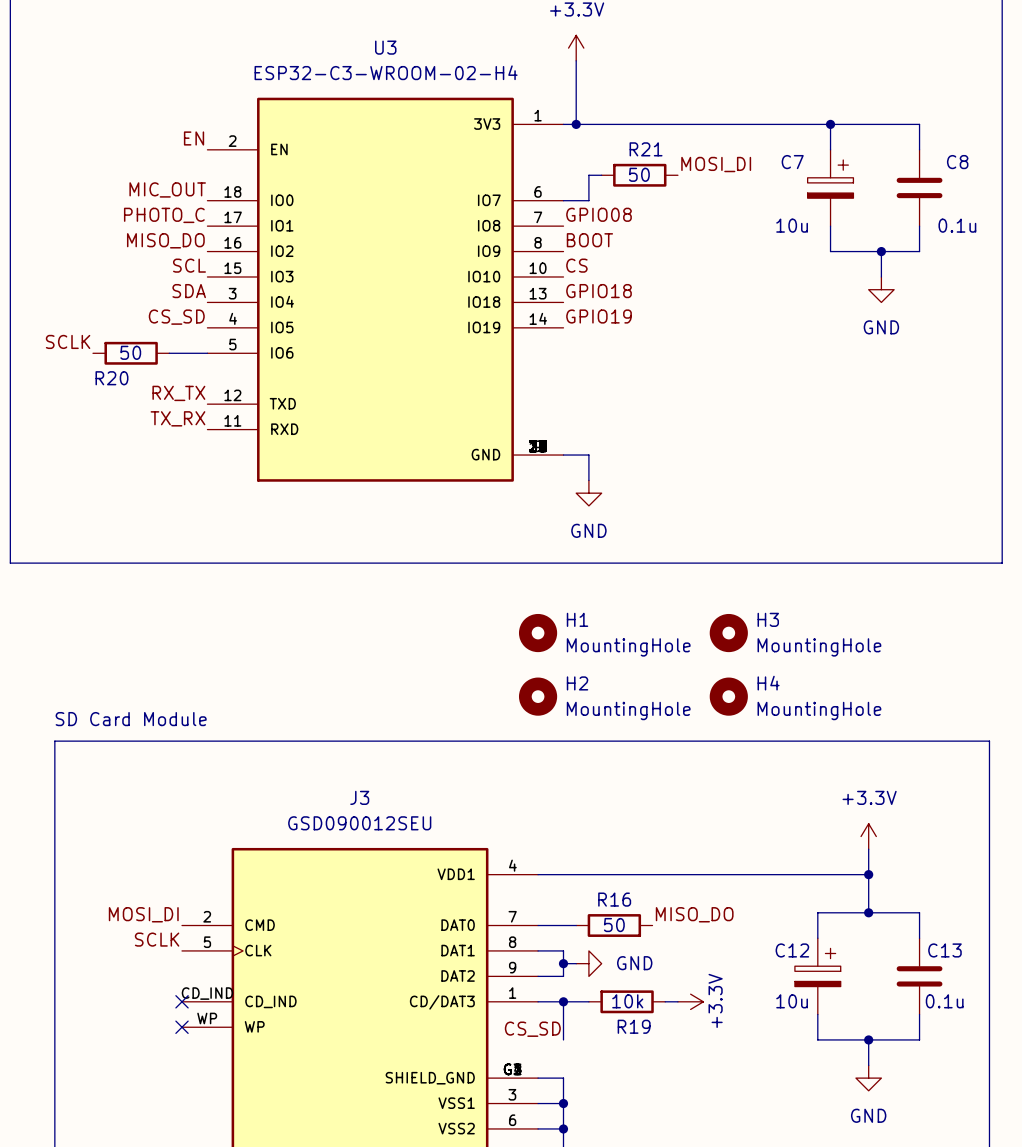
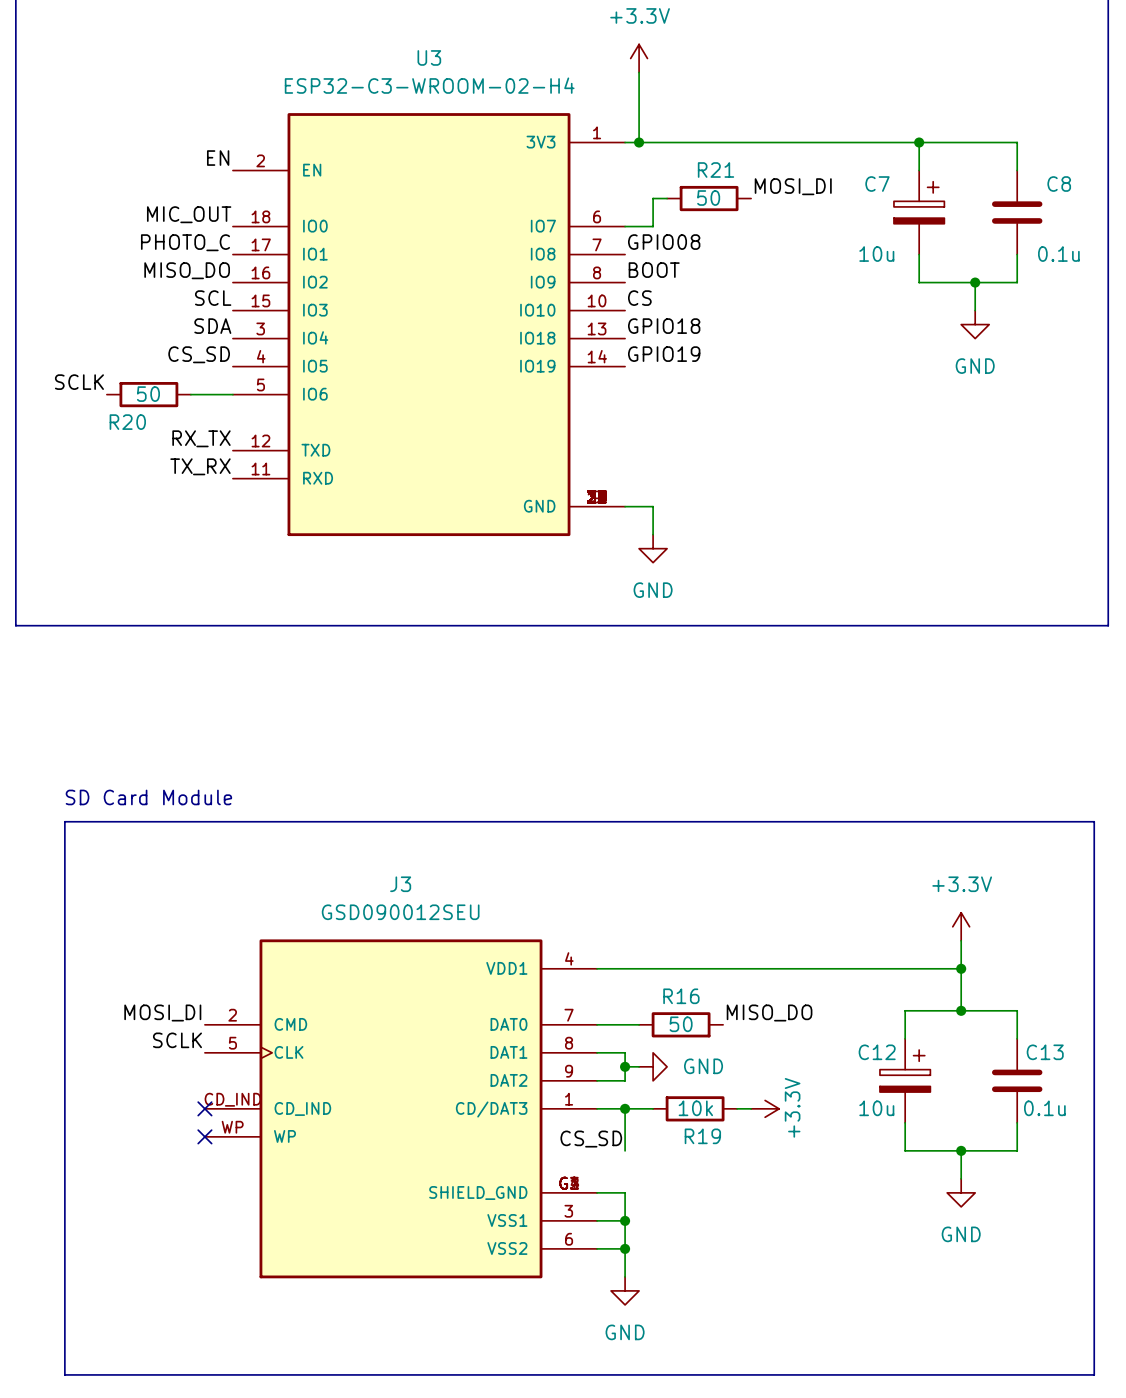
H1: MountingHole (538, 633) -> none
H3: MountingHole (728, 633) -> none
H2: MountingHole (538, 696) -> none
H4: MountingHole (728, 696) -> none

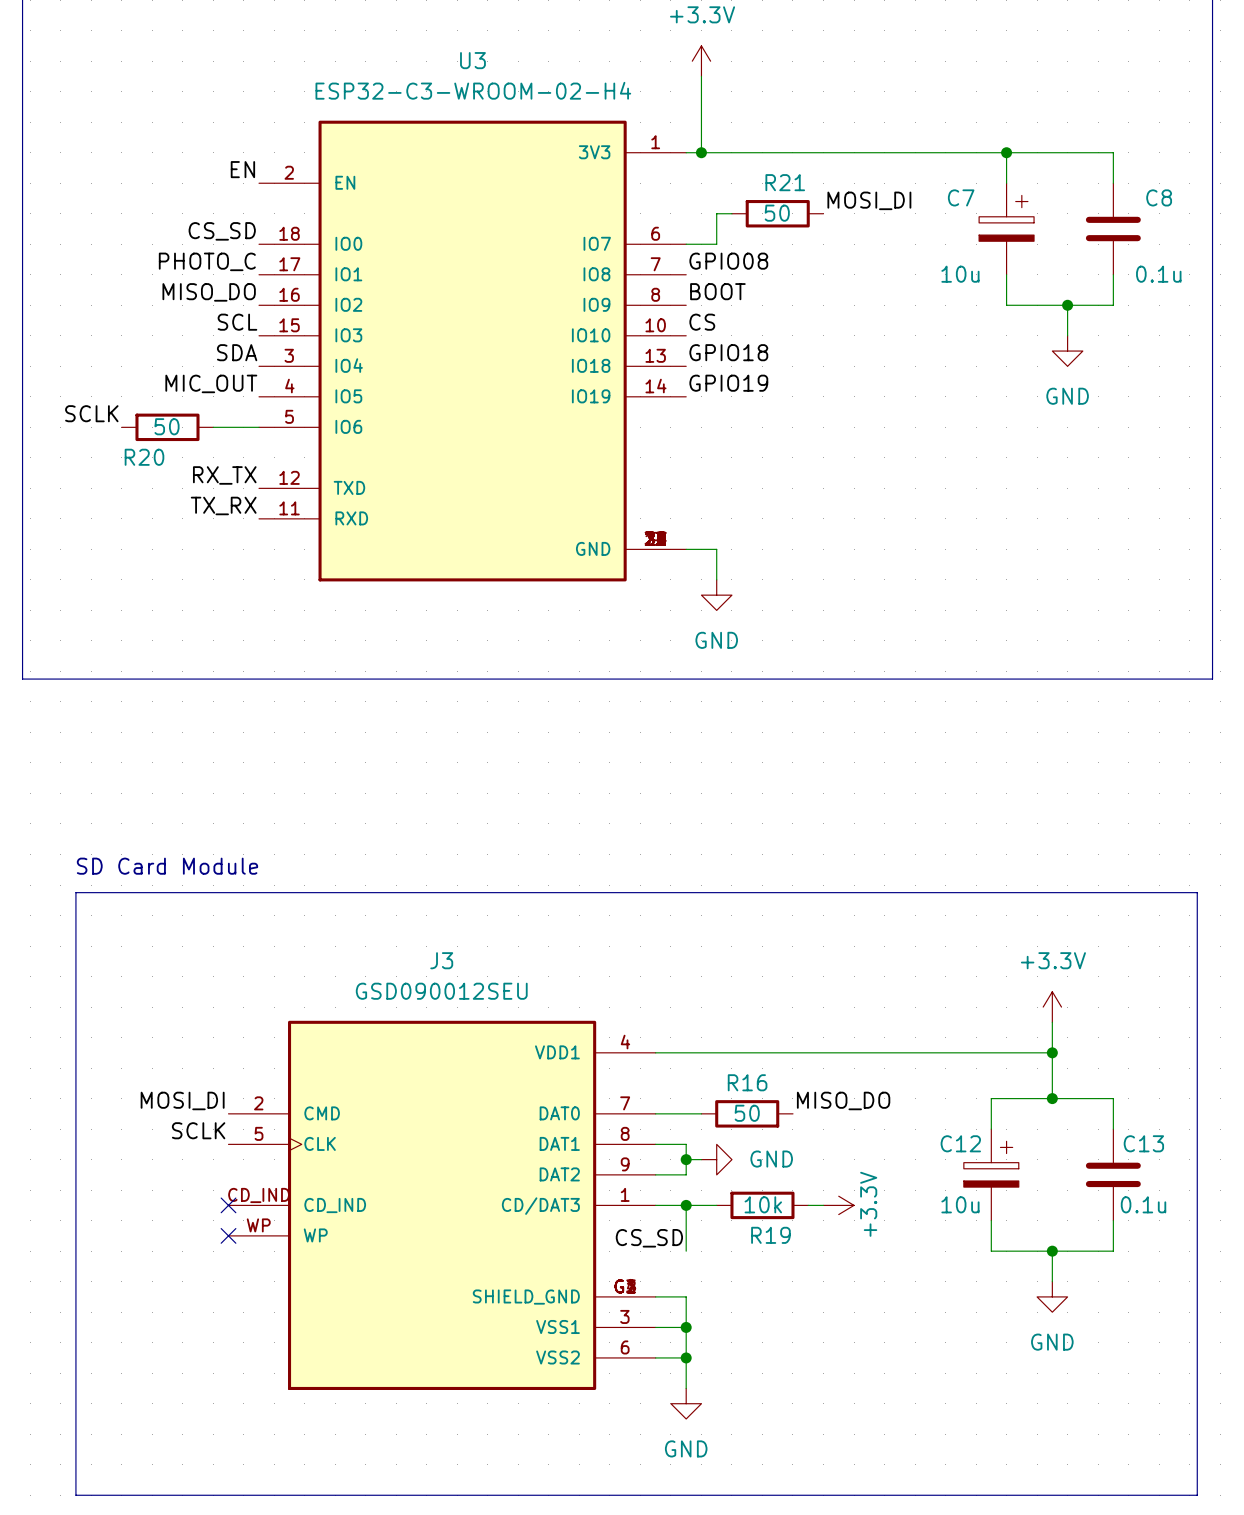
label: MIC_OUT (189, 214) -> CS_SD (222, 231)
label: CS_SD (199, 354) -> MIC_OUT (211, 383)

